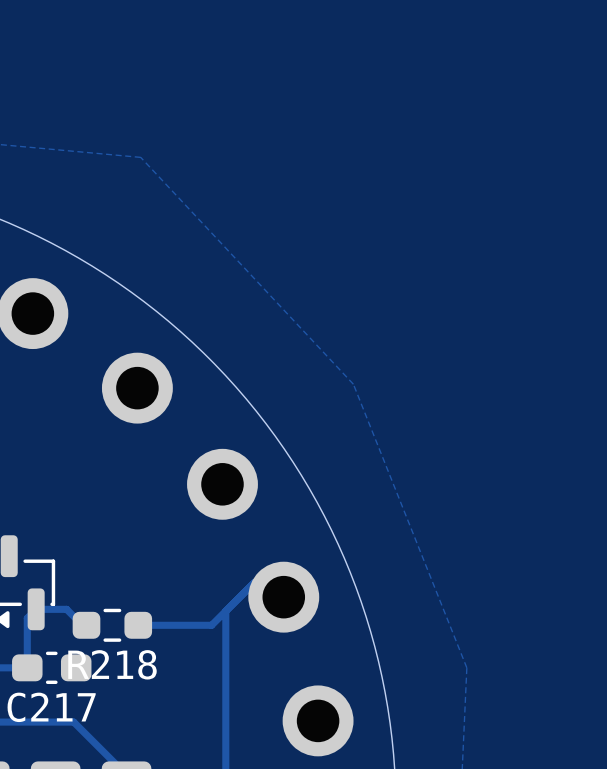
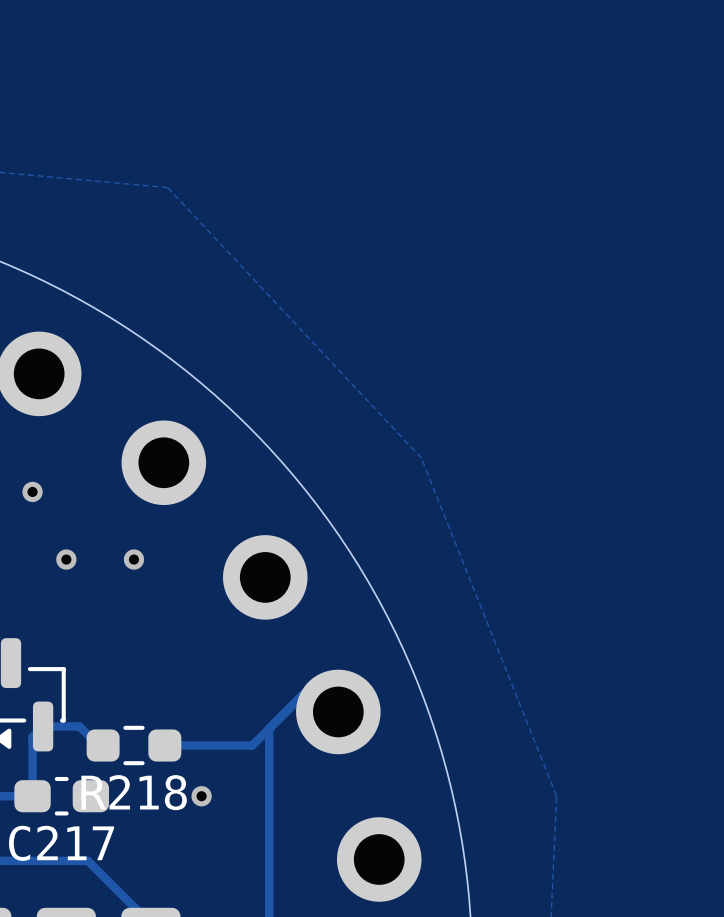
via: none -> (32, 491)
via: none -> (66, 559)
via: none -> (133, 559)
via: none -> (201, 796)

